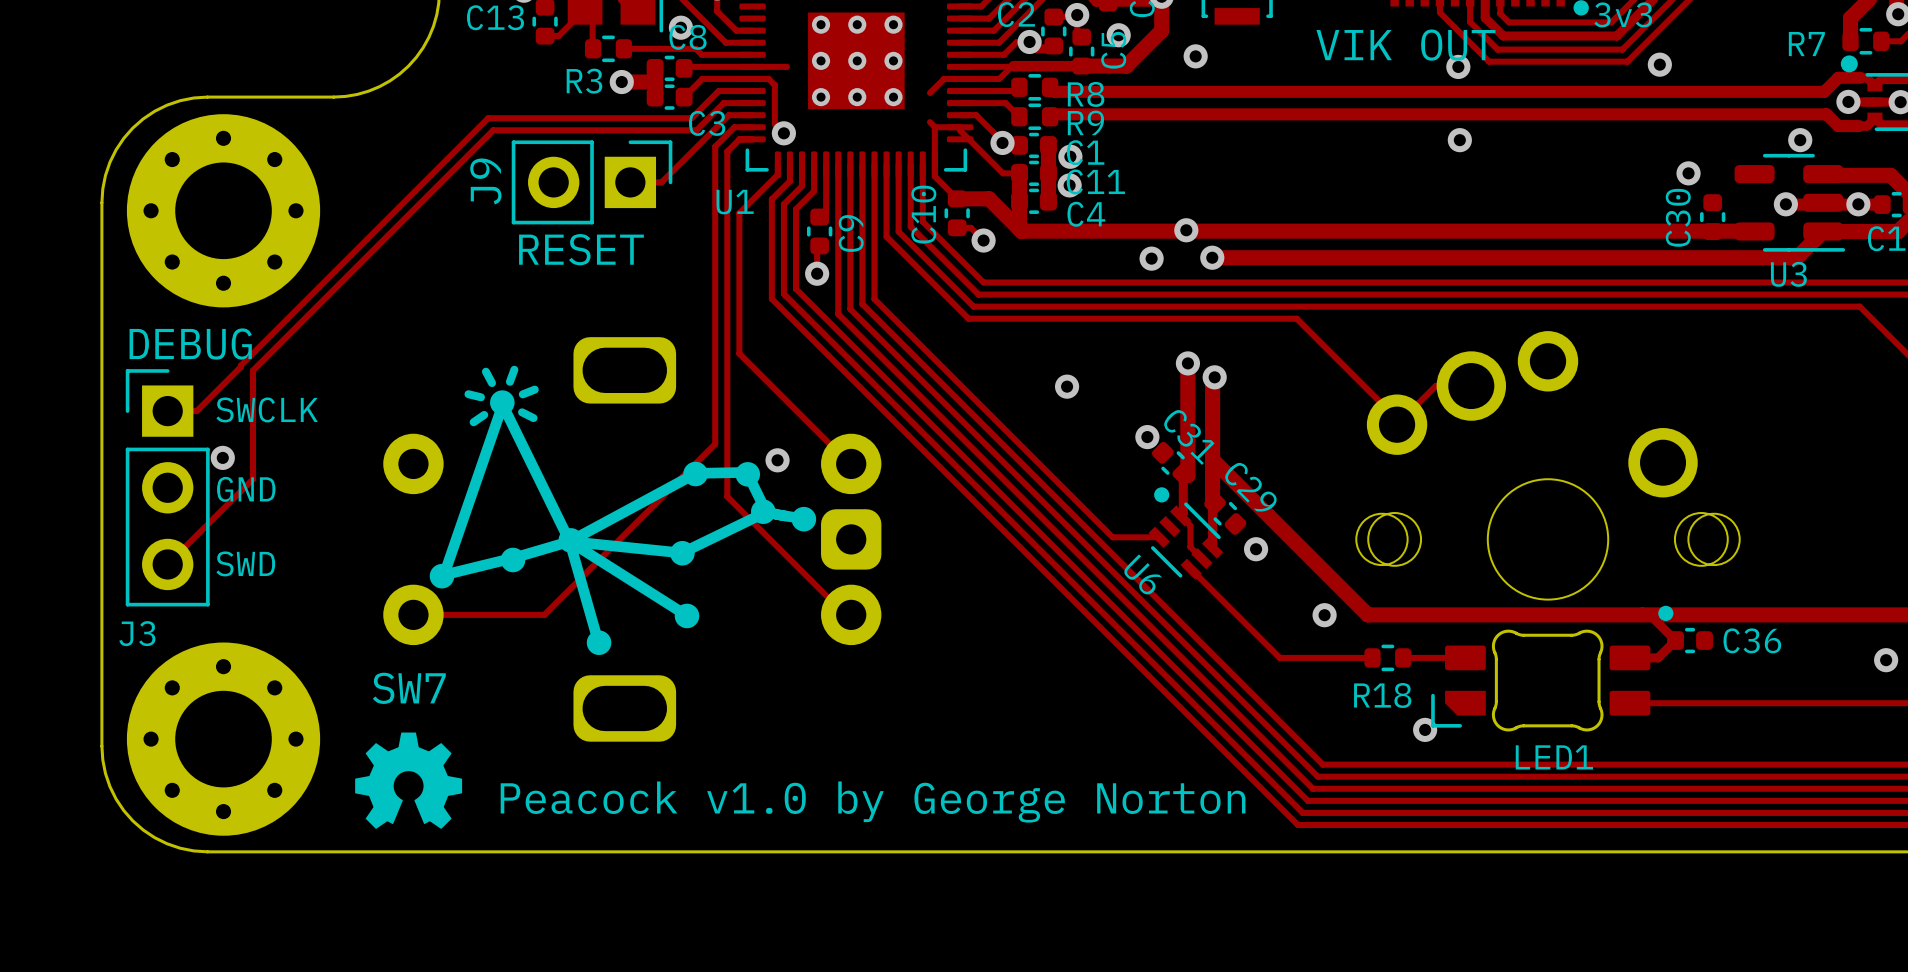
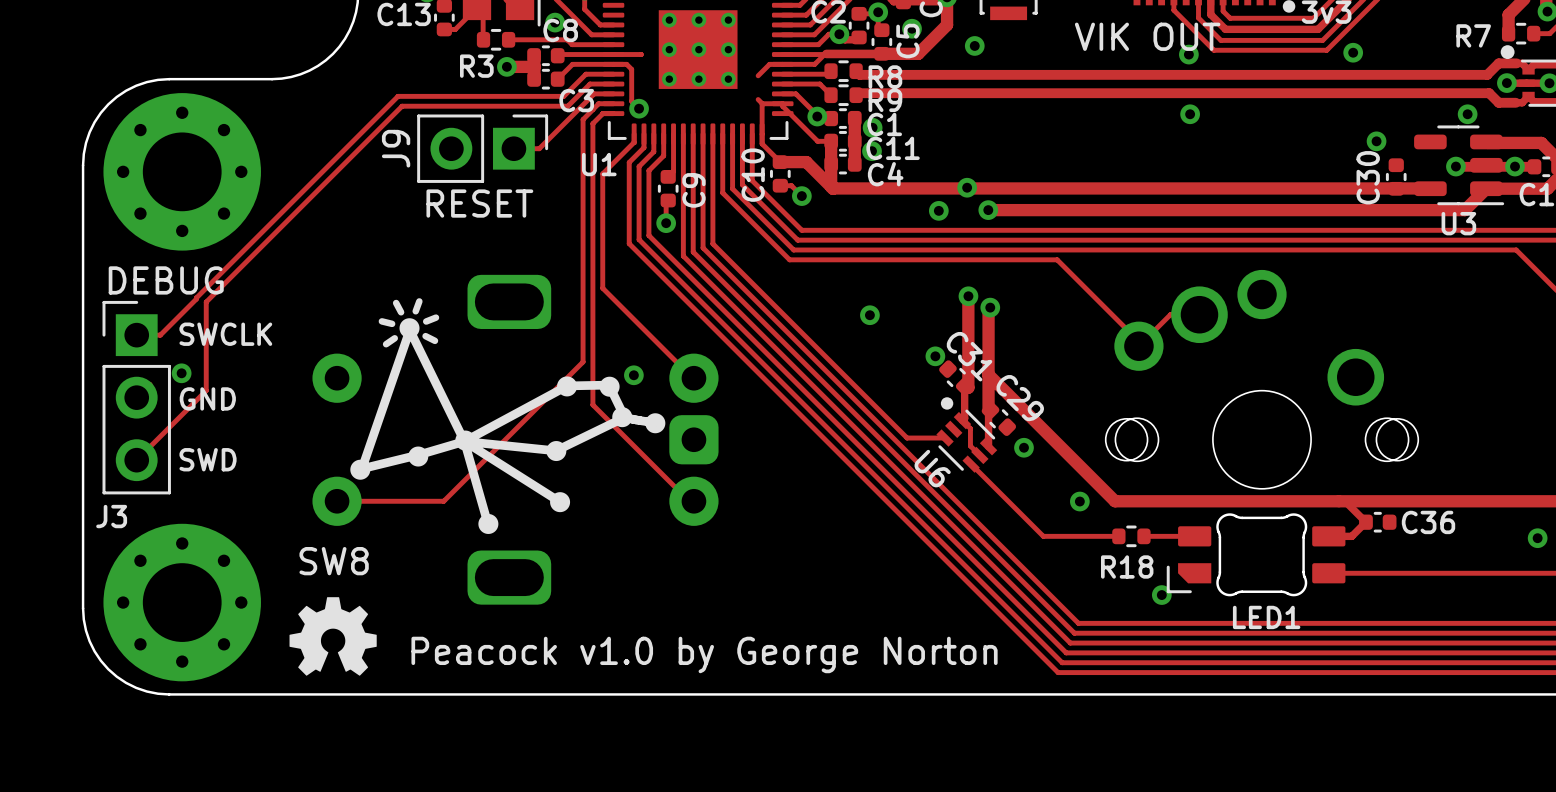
drawing: [1658, 605, 1674, 621] -> none
text: SW7 (409, 688) -> SW8 (334, 561)

